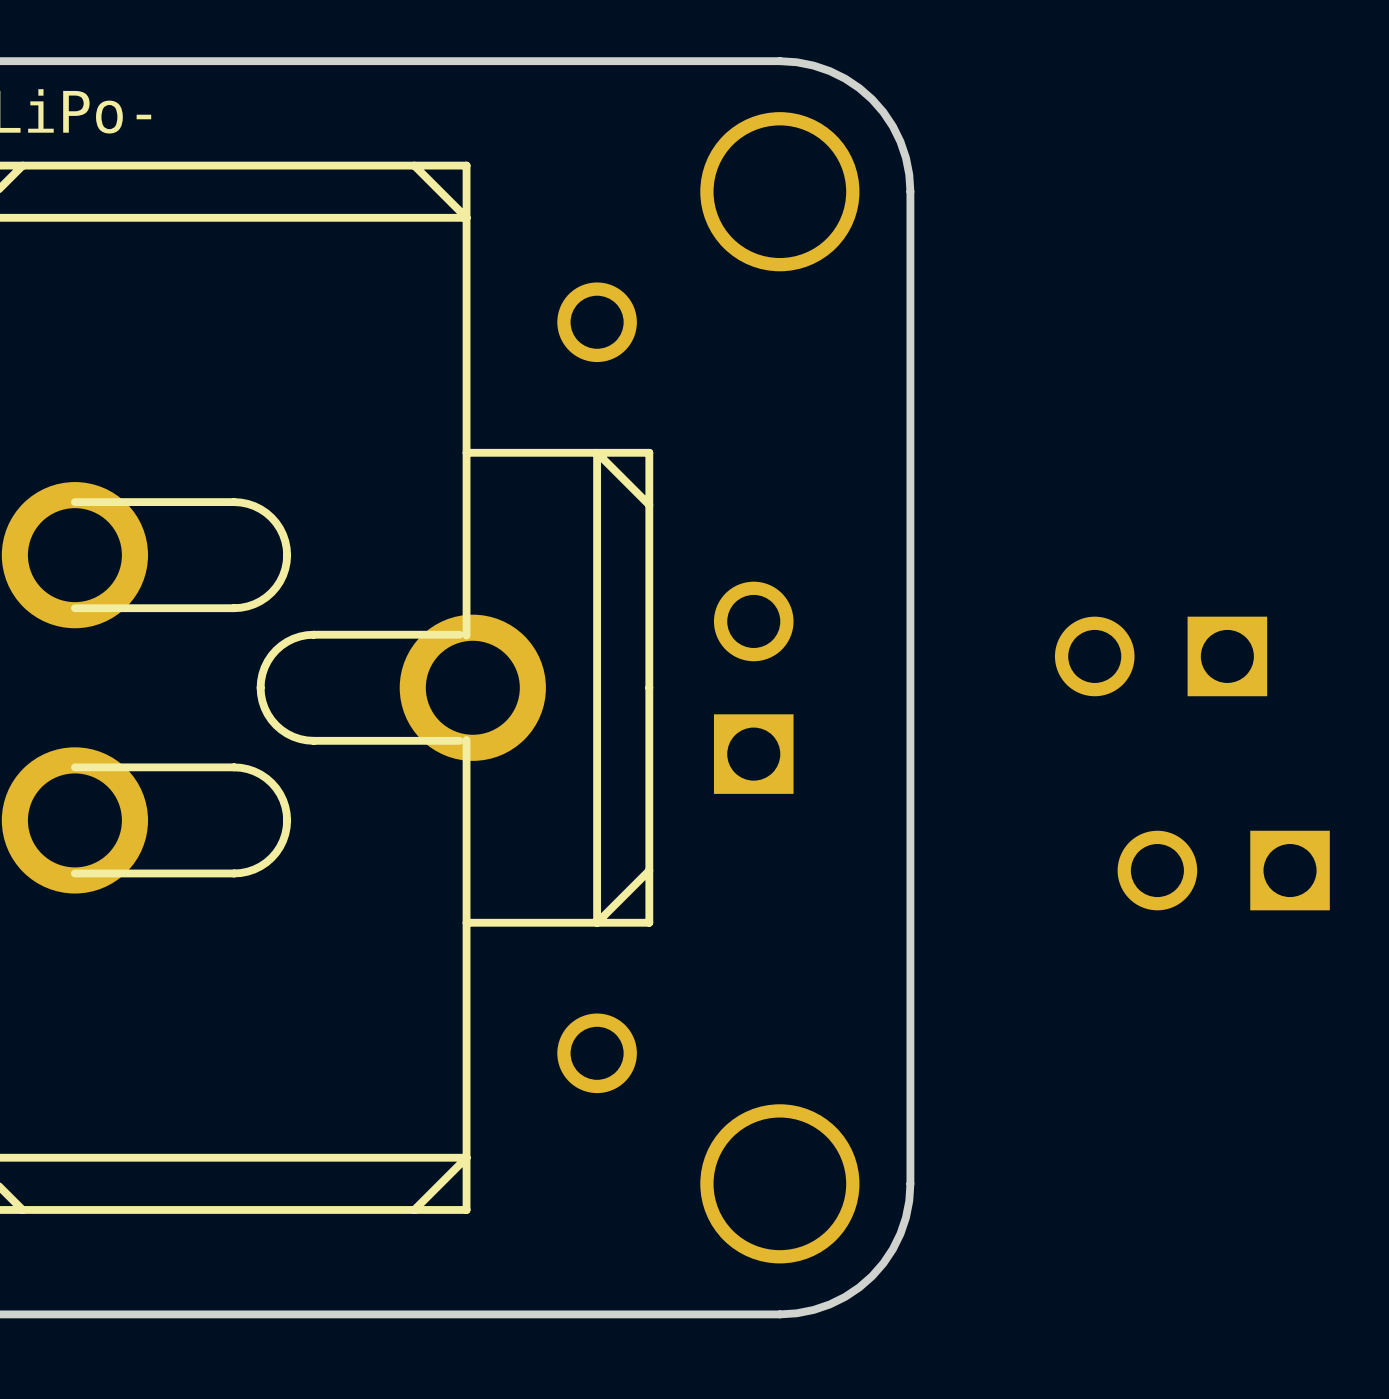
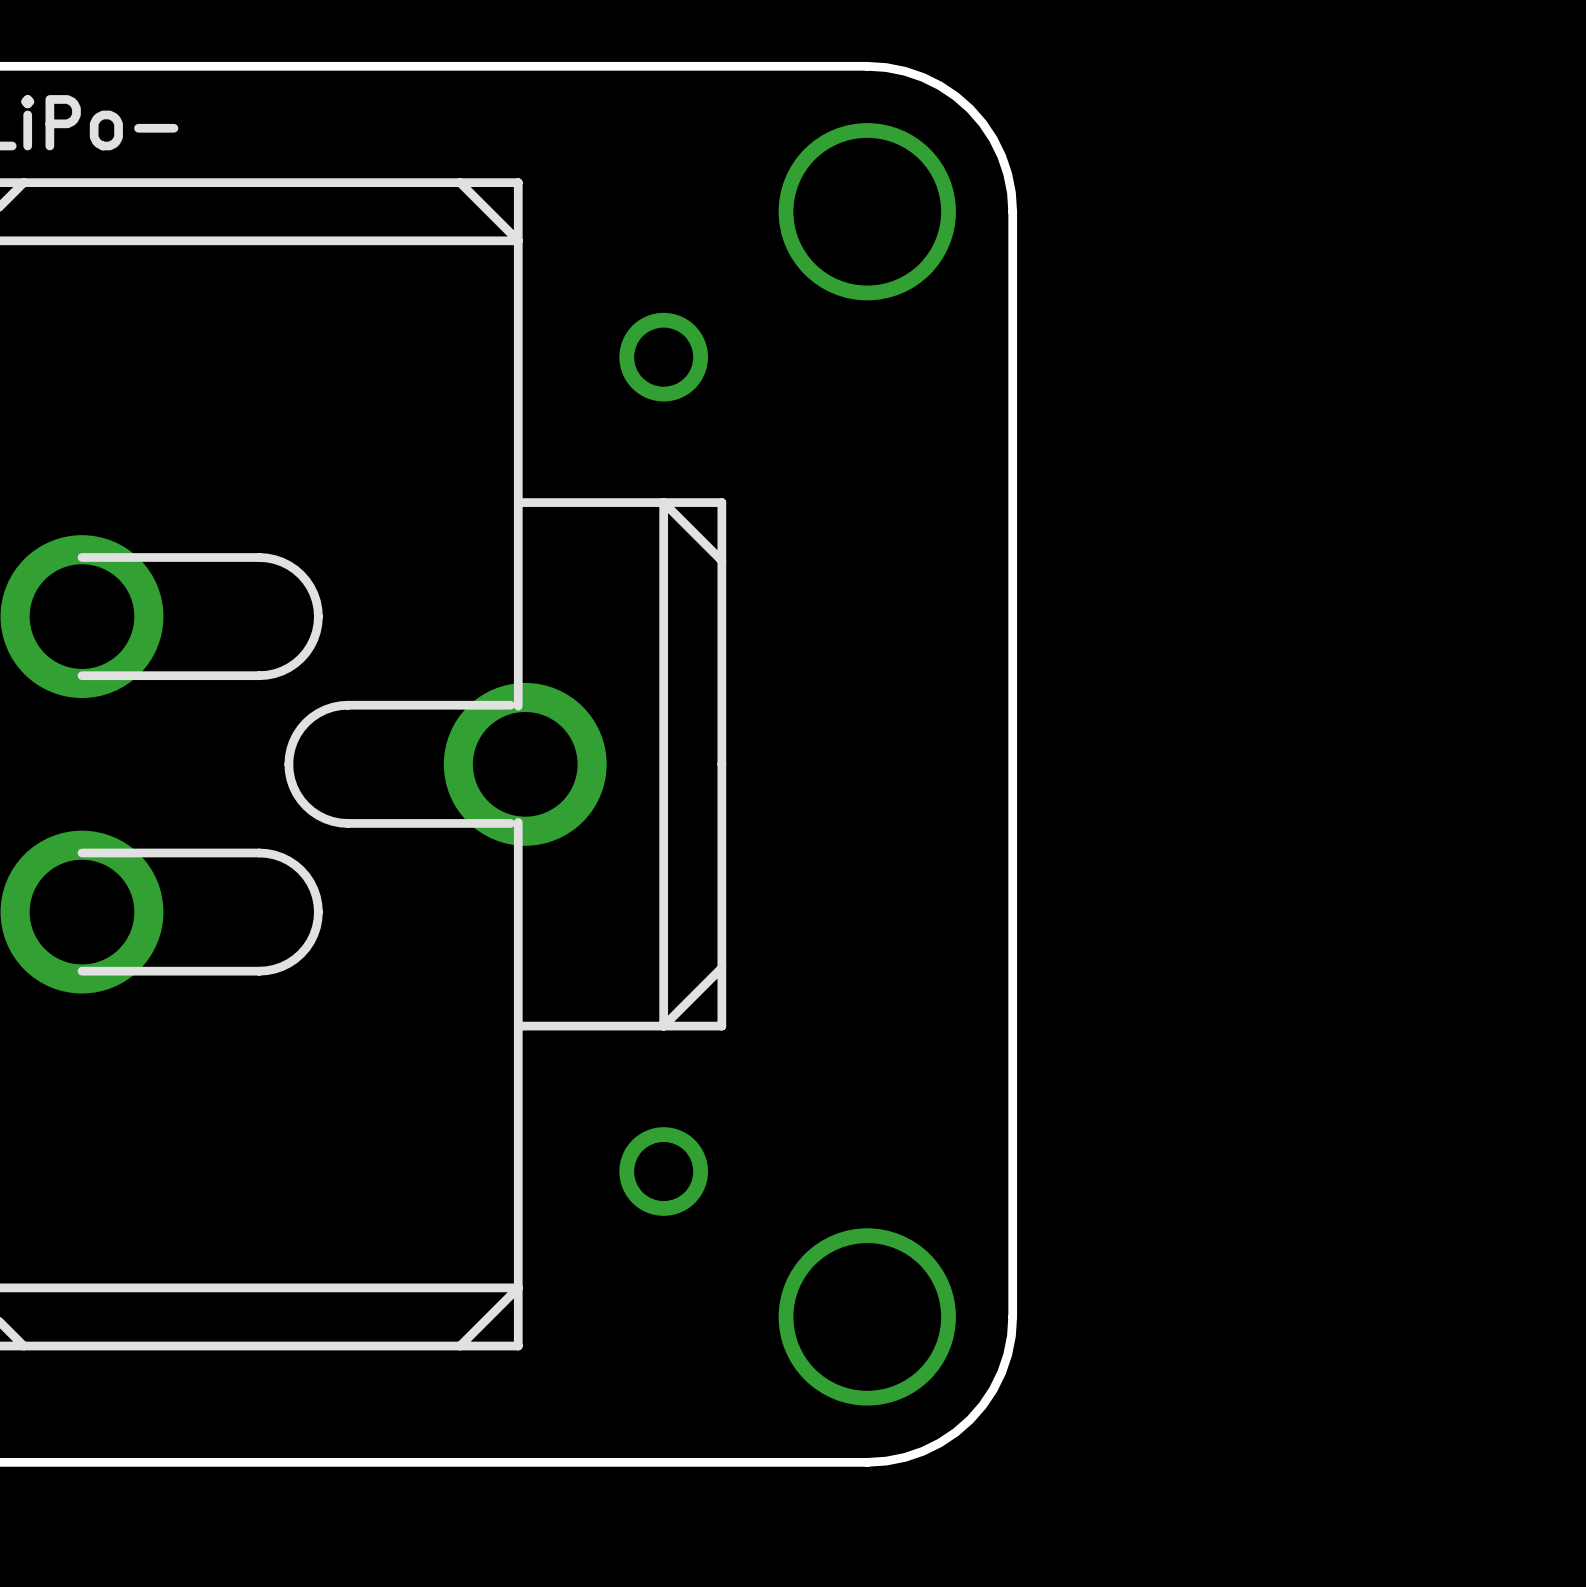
part: (1161, 656) -> none
part: (753, 687) -> none
part: (1223, 870) -> none

